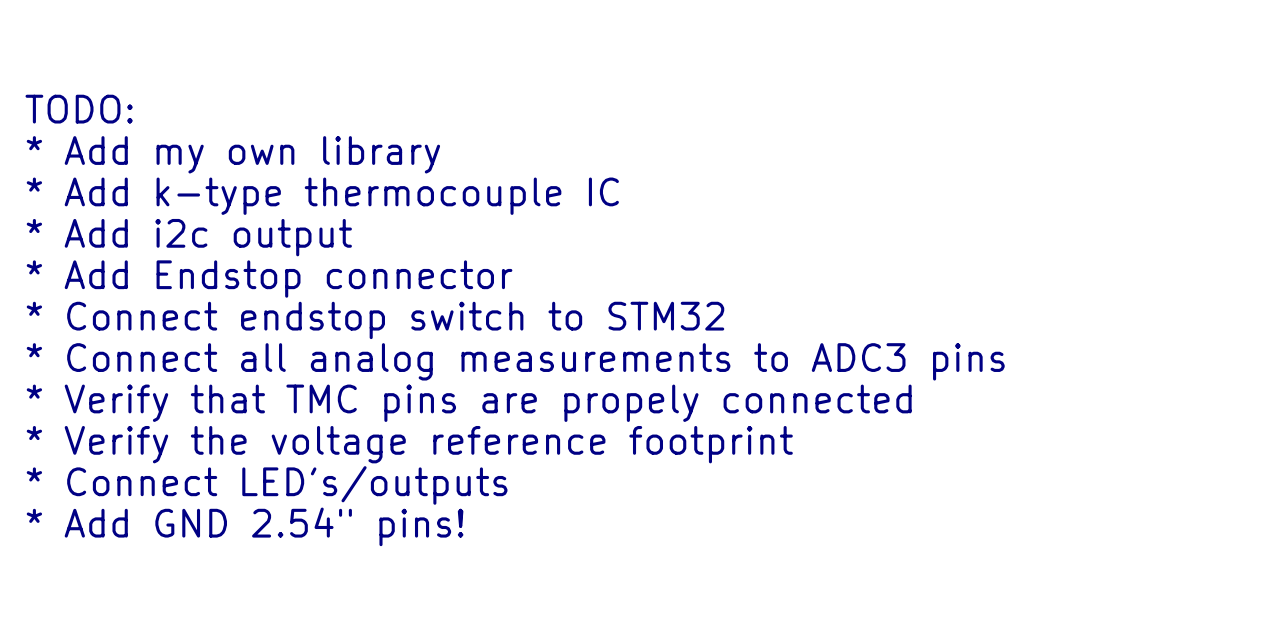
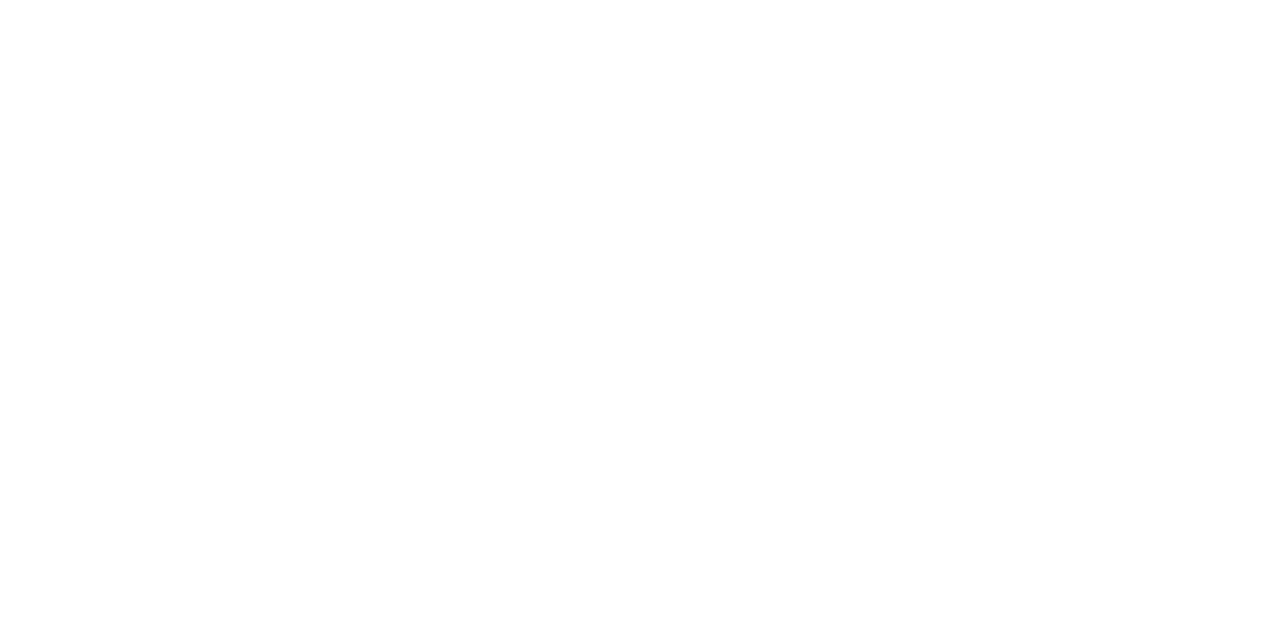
text: TODO: (79, 109) -> none
text: * Add my own library (233, 154) -> none
text: * Add k-type thermocouple IC (322, 196) -> none
text: * Add i2c output (189, 237) -> none
text: * Add Endstop connector (269, 279) -> none
text: * Connect endstop switch to STM32 (375, 320) -> none
text: * Connect all analog measurements to ADC3 pins (515, 361) -> none
text: * Verify that TMC pins are propely connected (469, 403) -> none
text: * Verify the voltage reference footprint (409, 444) -> none
text: * Connect LED's/outputs (267, 485) -> none
text: * Add GND 2.54" pins! (245, 526) -> none

